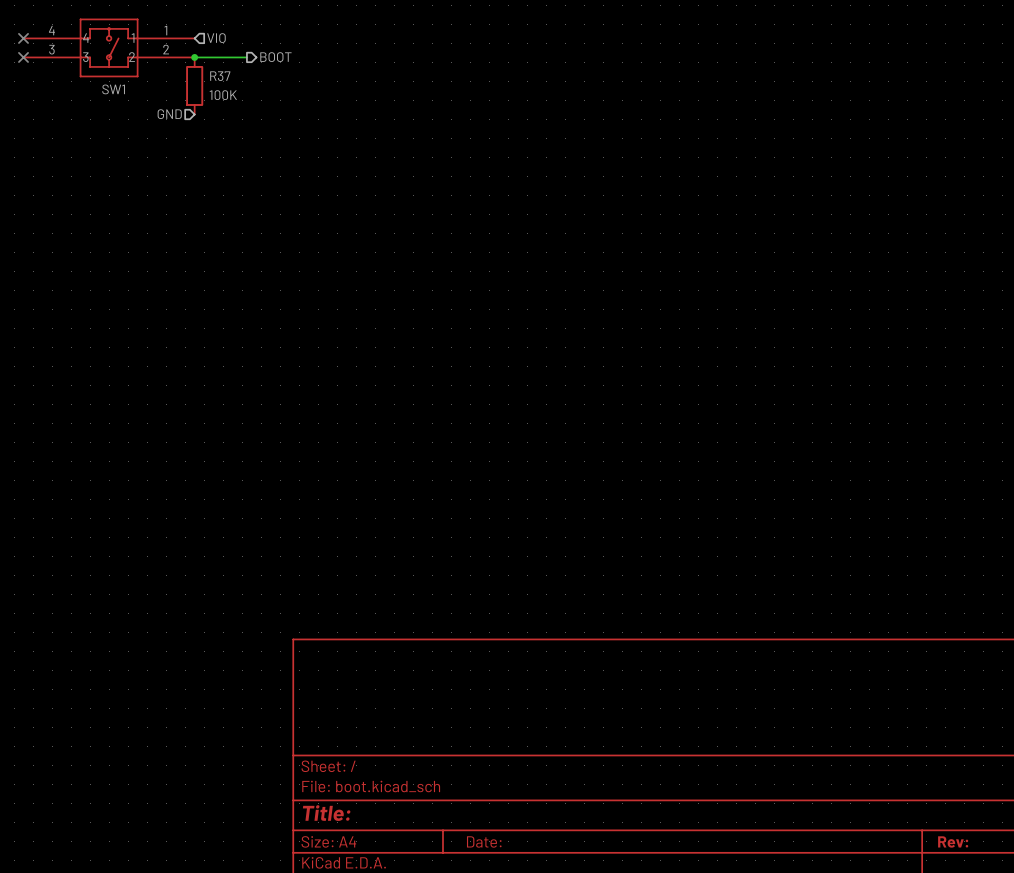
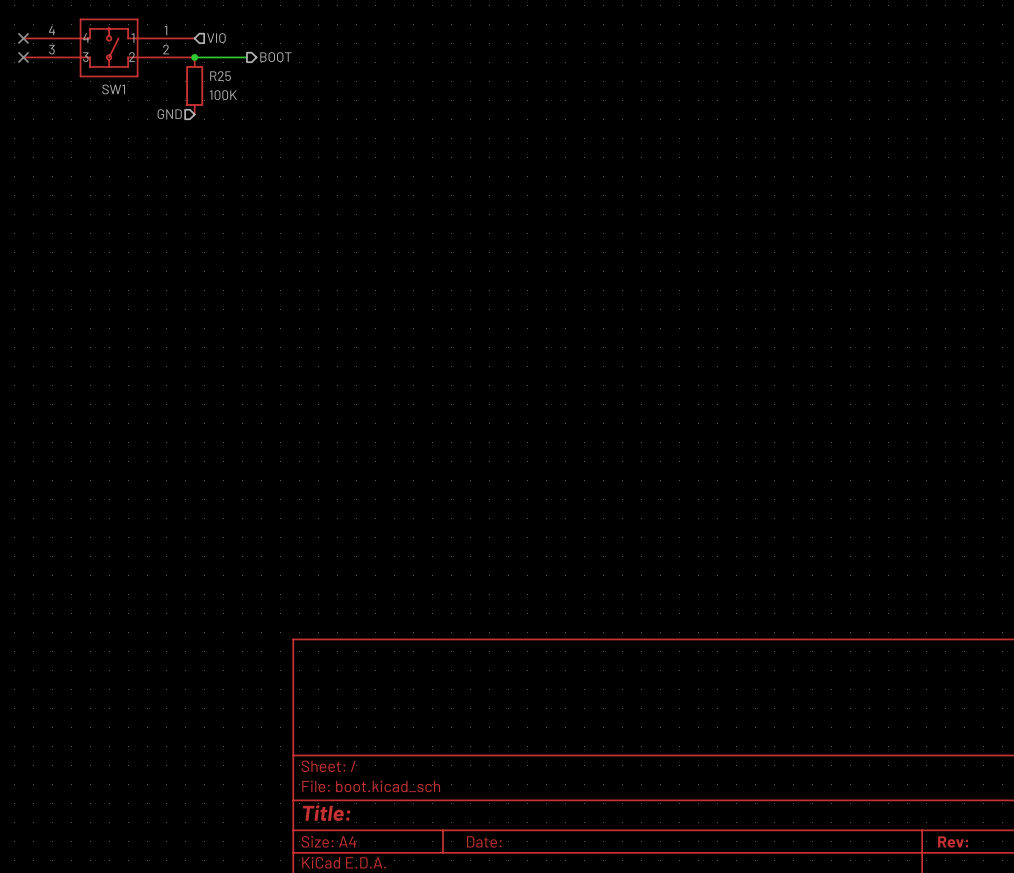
R37 name: R37 (220, 76) -> R25 (220, 76)

